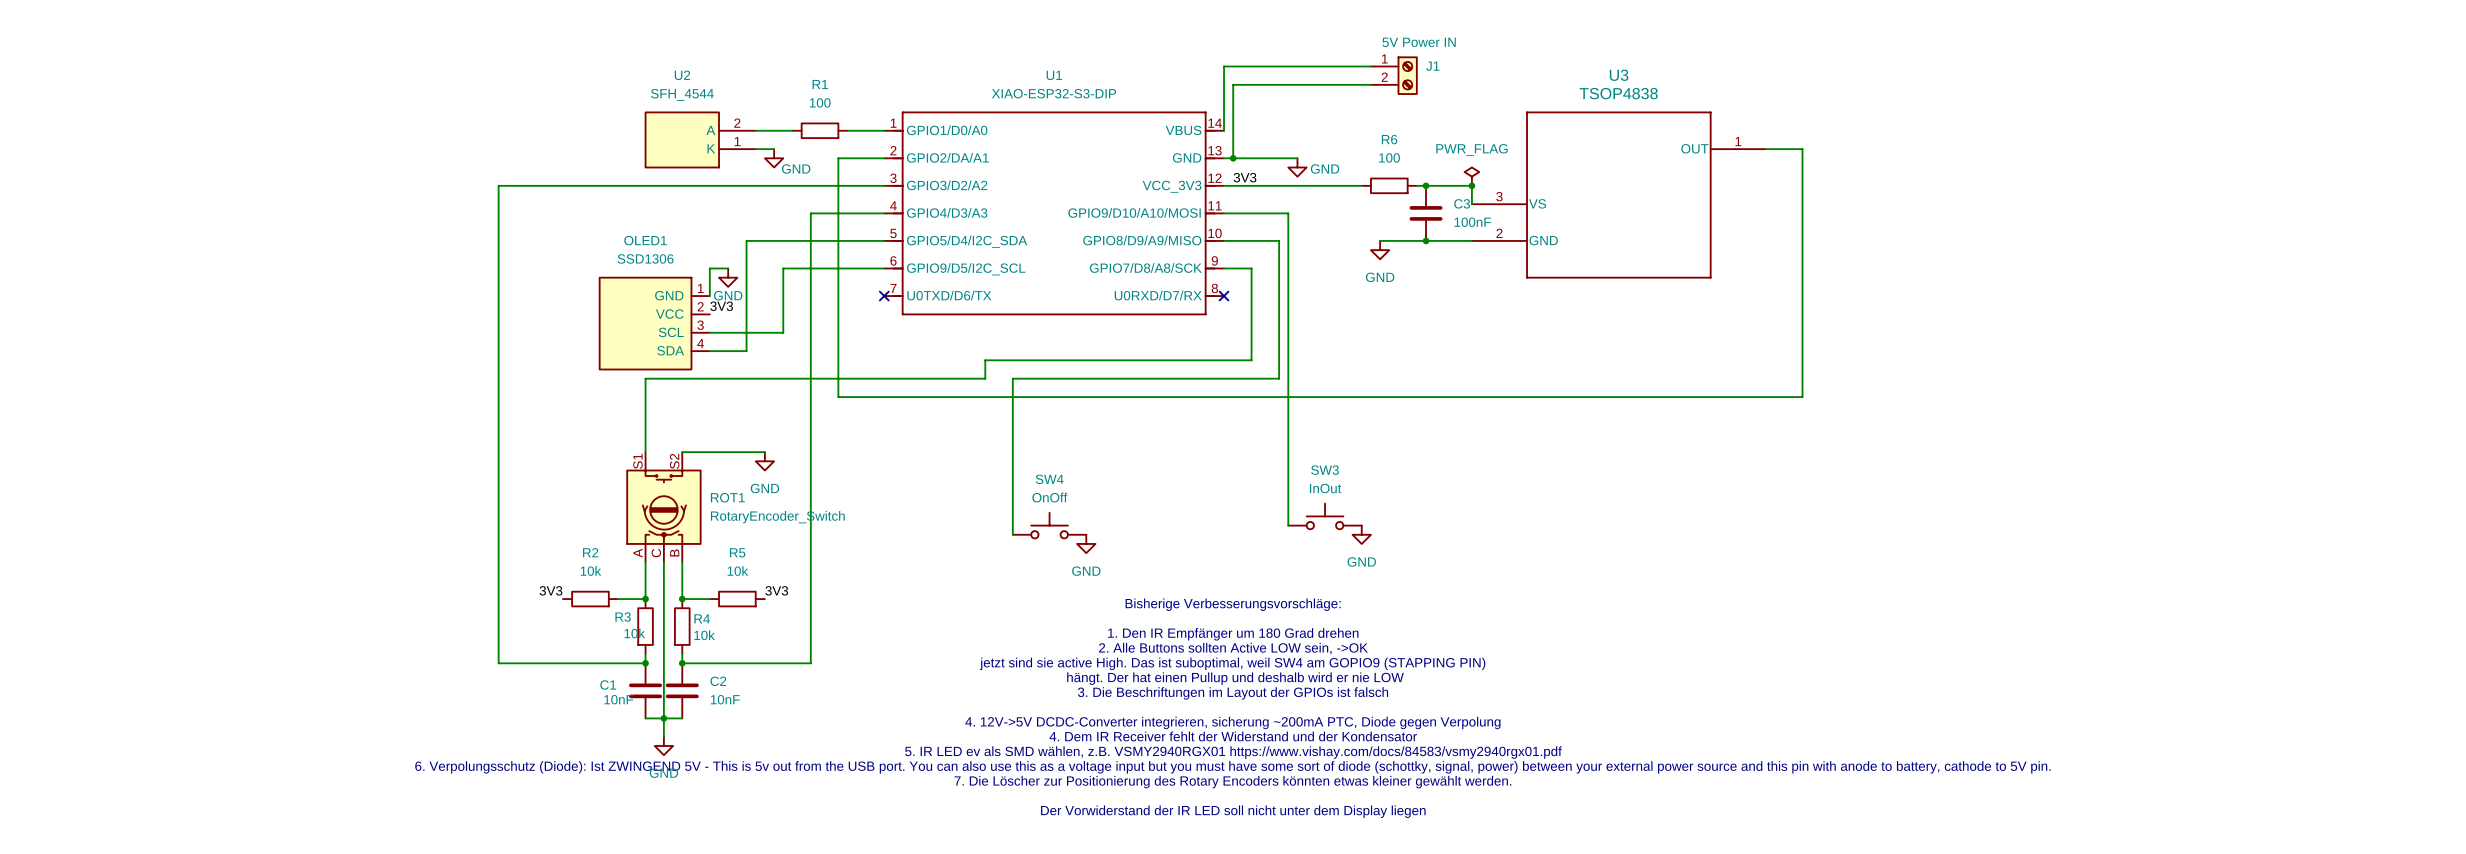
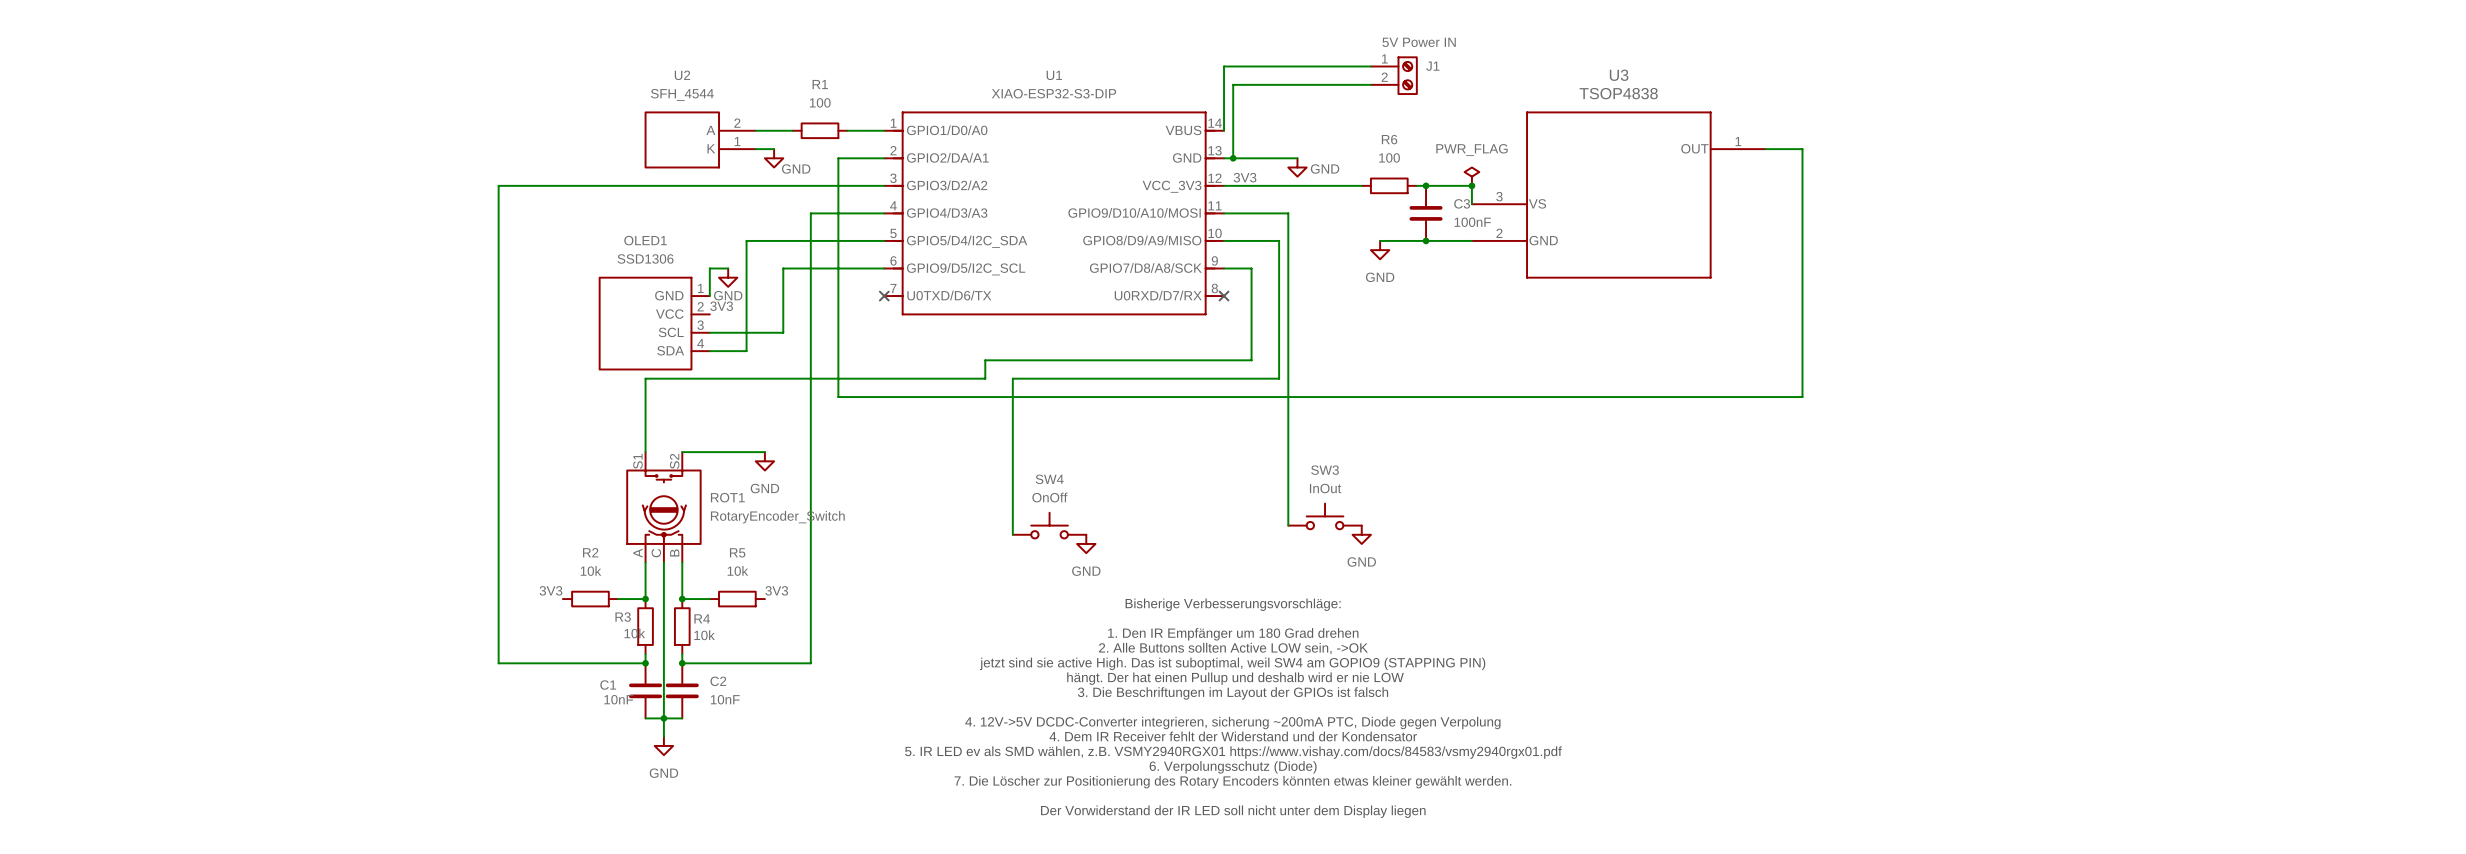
text: 6. Verpolungsschutz (Diode): Ist ZWINGEND 5V - This is 5v out from the USB port. You can also use this as a voltage input but you must have some sort of diode (schottky, signal, power) between your external power source and this pin with anode to battery, cathode to 5V pin. (1232, 767) -> 6. Verpolungsschutz (Diode) (1233, 767)

